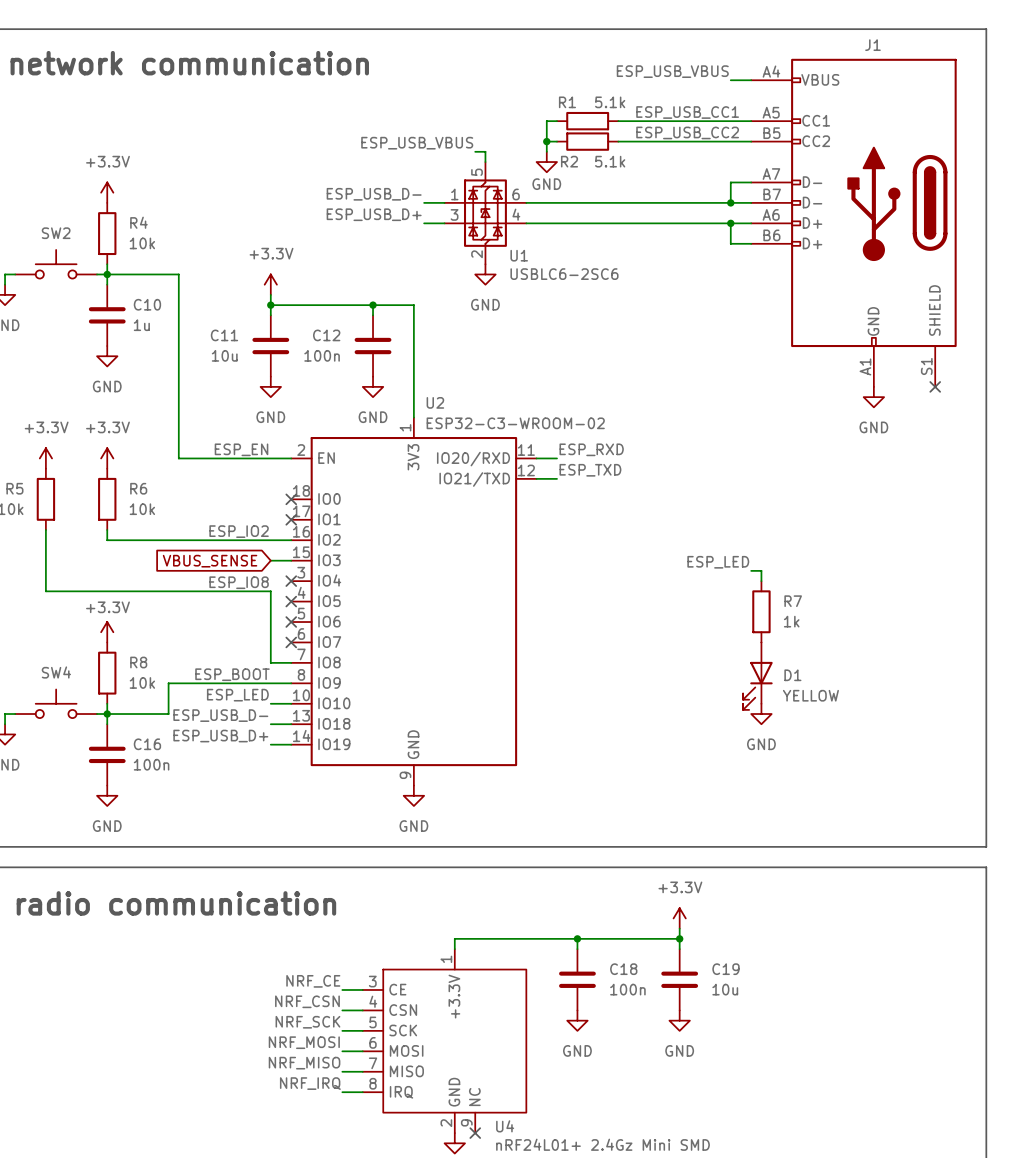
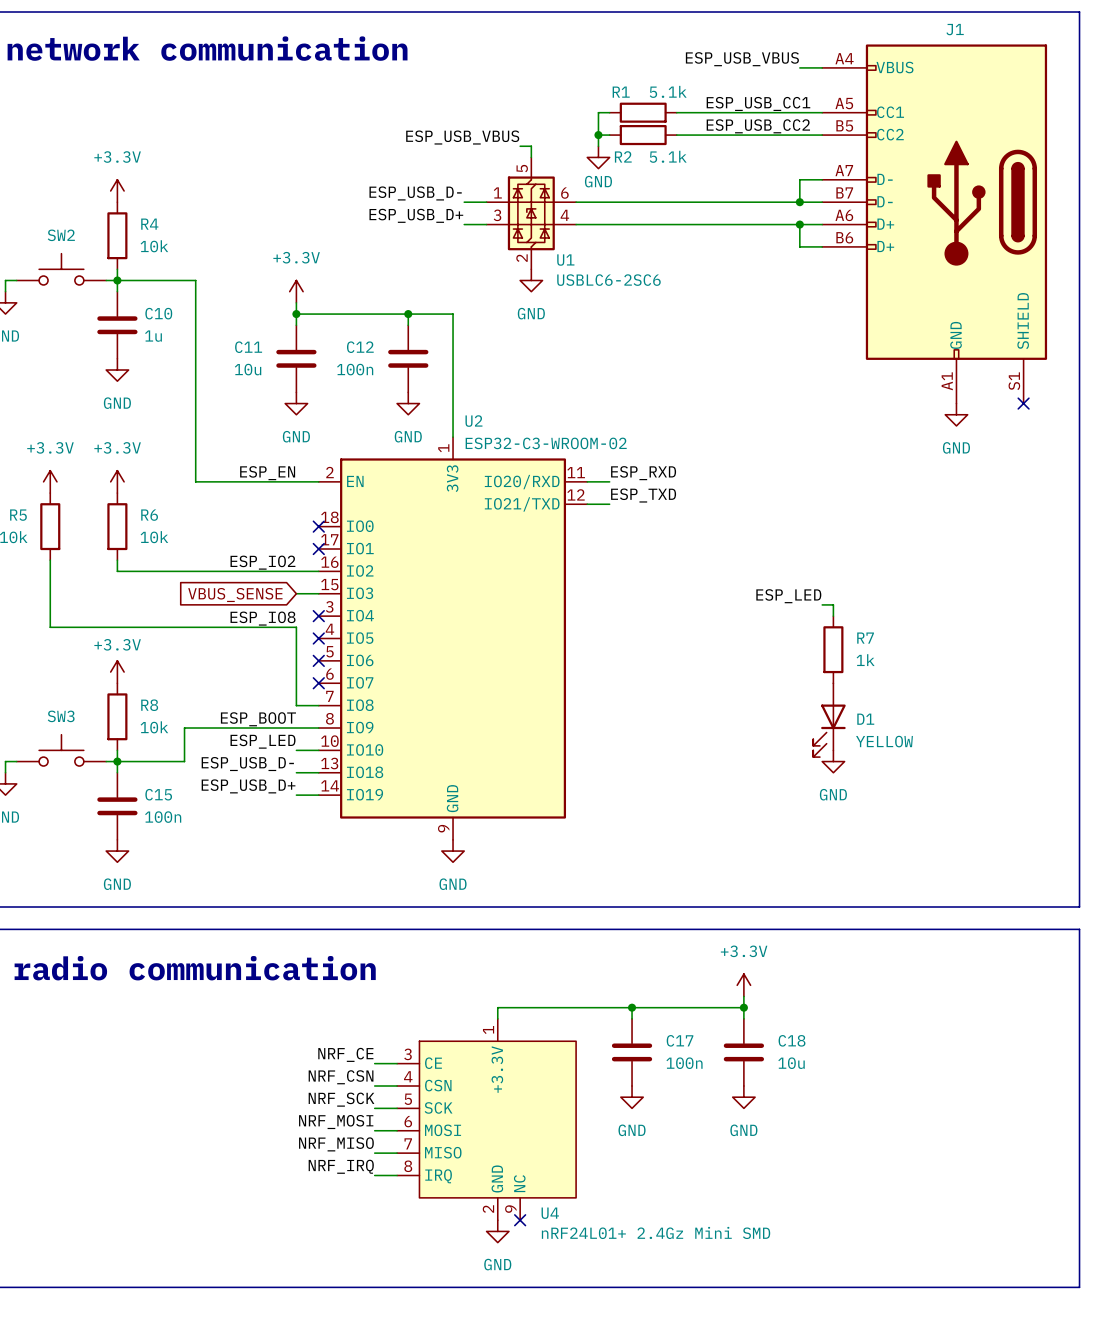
SW4 name: SW4 (56, 672) -> SW3 (61, 716)
C16 name: C16 (147, 744) -> C15 (158, 794)
C18 name: C18 (623, 969) -> C17 (680, 1040)
C19 name: C19 (725, 969) -> C18 (792, 1040)

